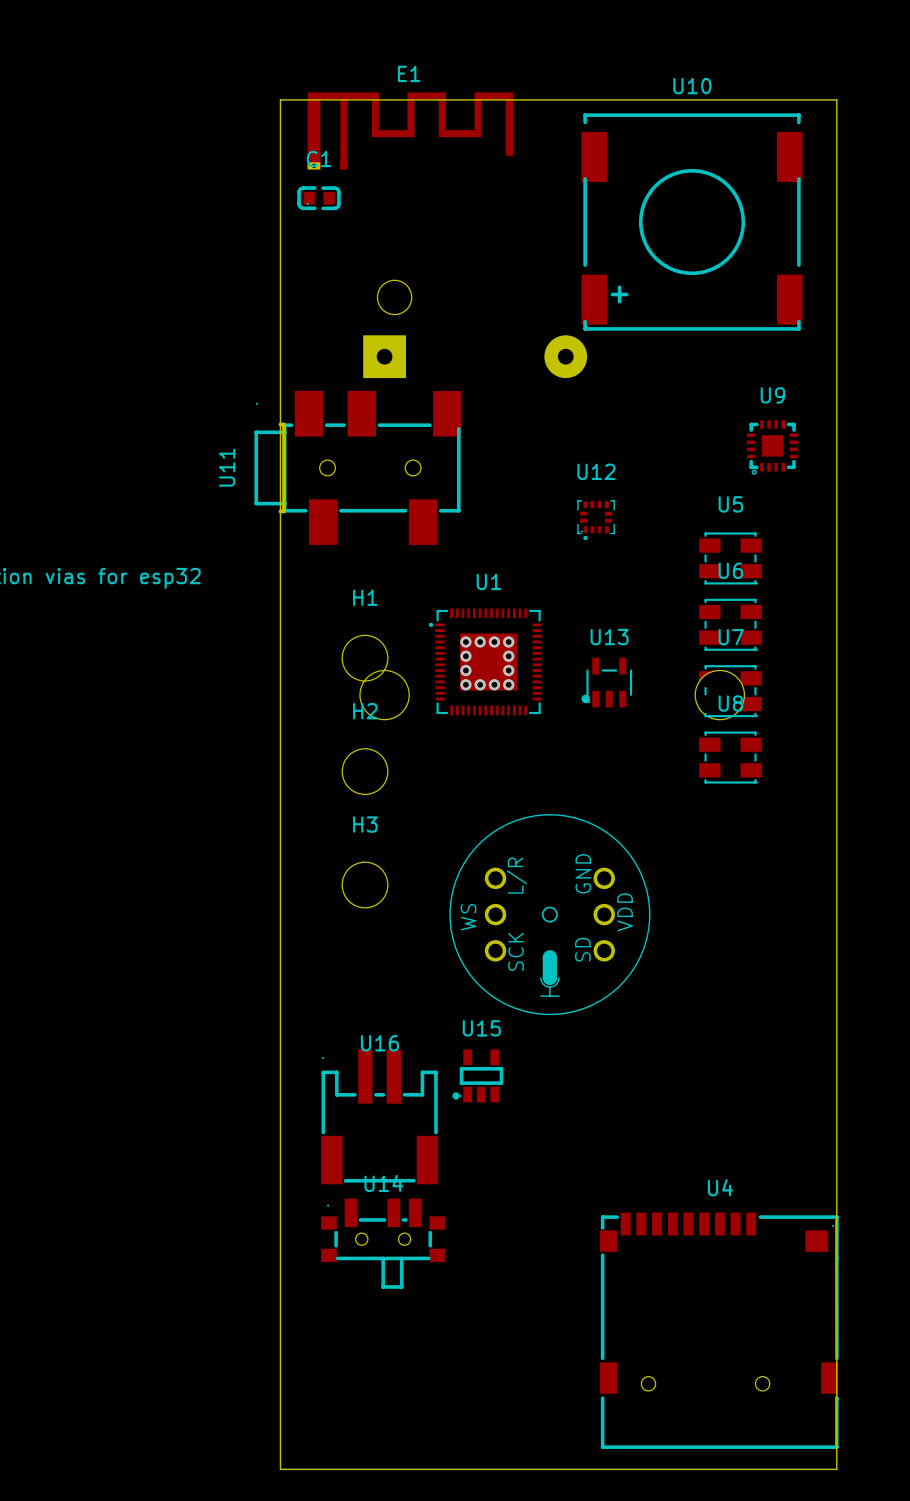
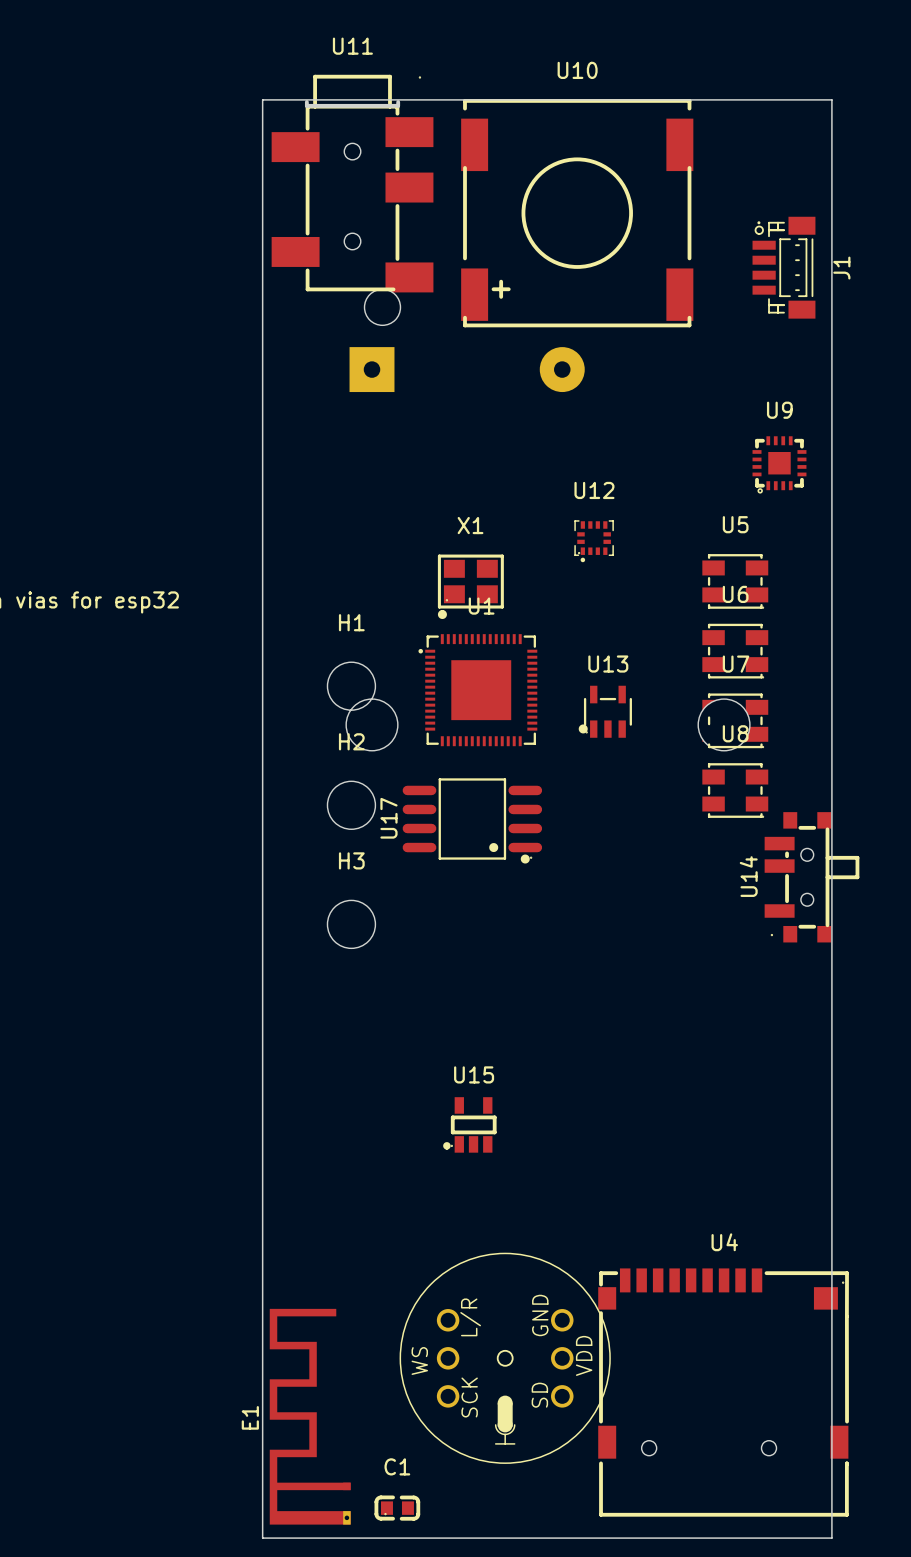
board edge: (822, 99) (836, 99) (836, 1469) (822, 1469) -> (831, 99) (831, 1538)
E1 rotation: 0° (410, 130) -> 90° counterclockwise (310, 1416)
E1 position: (410, 130) -> (310, 1416)
C1 position: (318, 198) -> (397, 1508)
U10 position: (692, 222) -> (577, 213)
J1: none -> (783, 267)
U11 rotation: 0° (358, 467) -> 90° clockwise (352, 183)
U11 position: (358, 467) -> (352, 183)
X1: none -> (470, 586)
via: (465, 641) -> none
via: (480, 641) -> none
via: (494, 641) -> none
via: (508, 641) -> none
via: (465, 656) -> none
via: (508, 656) -> none
via: (465, 670) -> none
via: (508, 670) -> none
via: (465, 684) -> none
via: (480, 684) -> none
via: (494, 684) -> none
via: (508, 684) -> none
U17: none -> (472, 820)
part: (549, 914) -> none
U16: (379, 1116) -> none
U14 rotation: 0° (383, 1243) -> 90° counterclockwise (811, 877)
U14 position: (383, 1243) -> (811, 877)
part: none -> (505, 1358)

